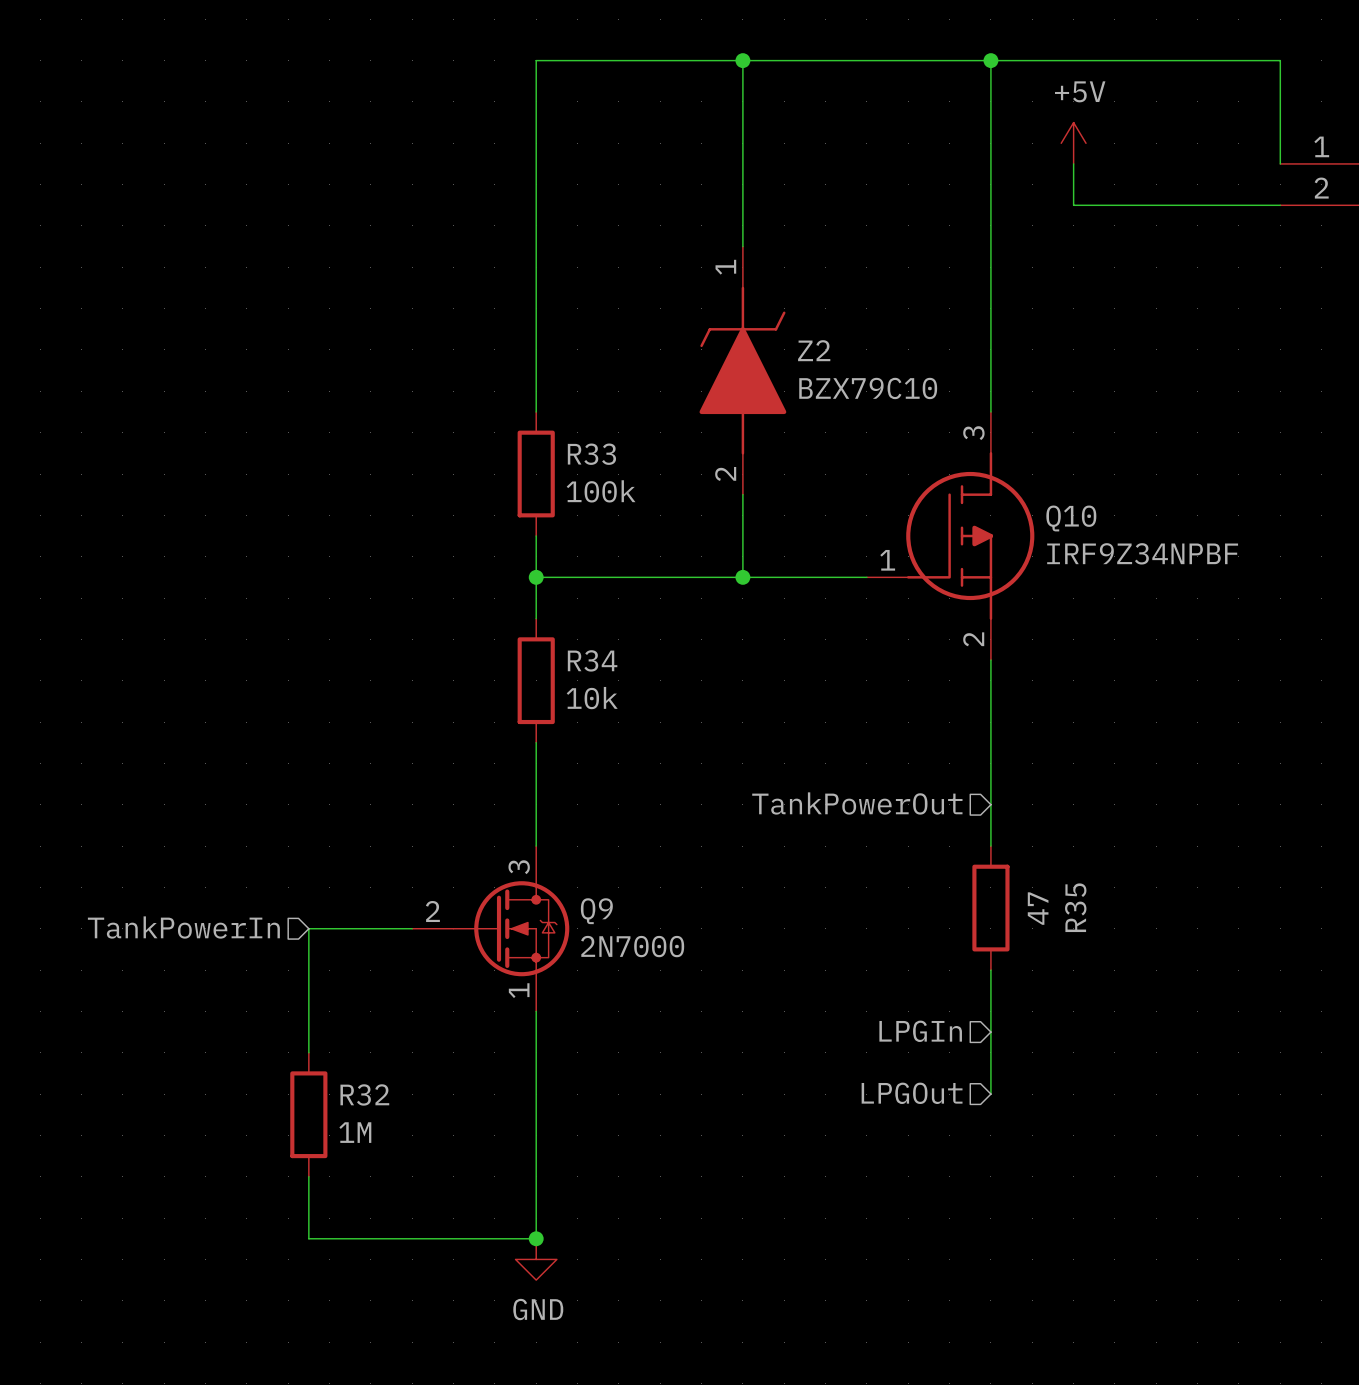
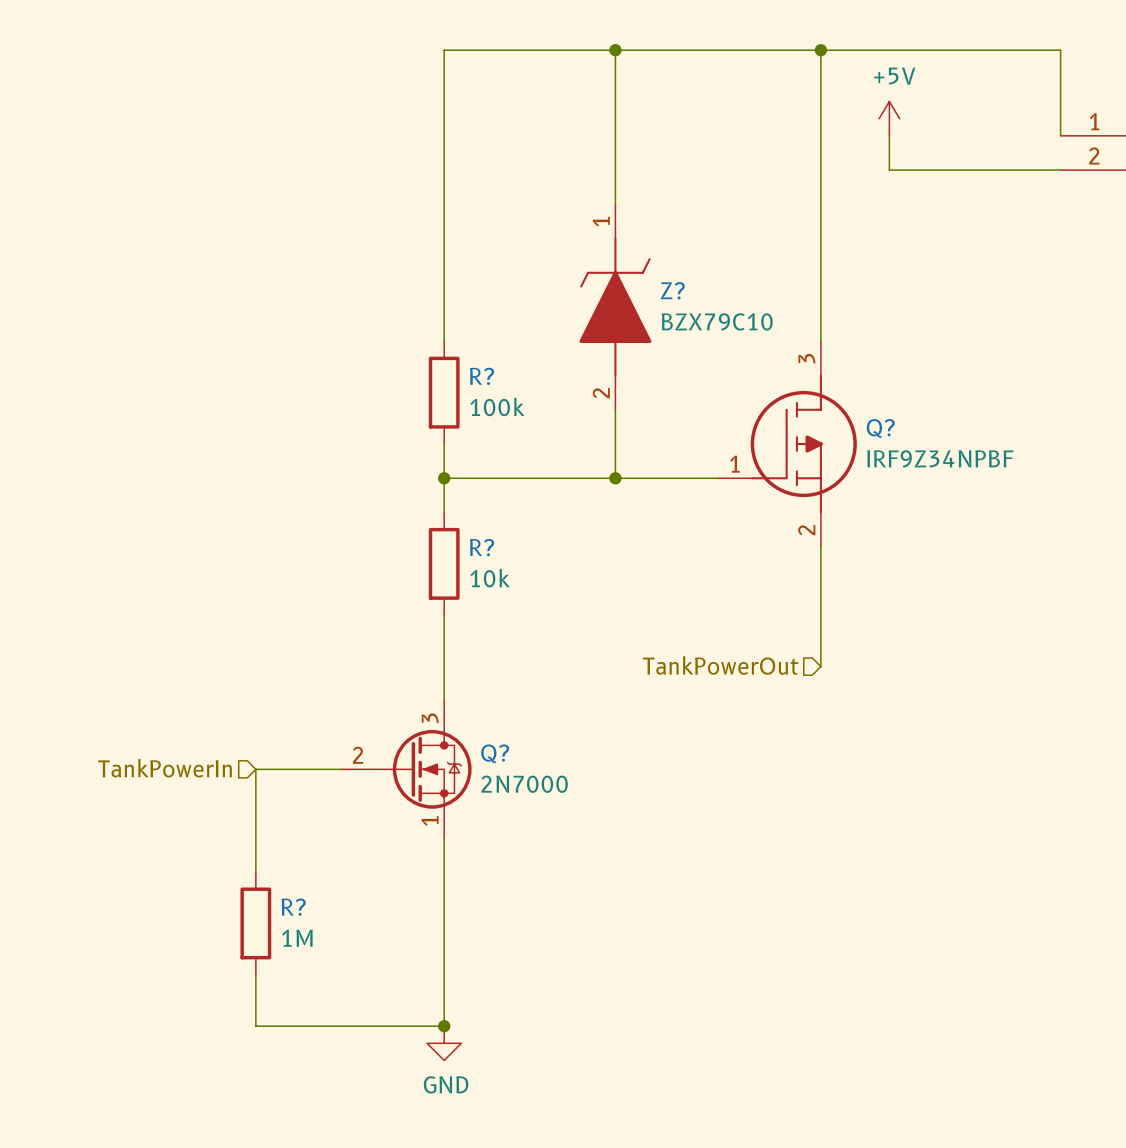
Z2 name: Z2 (814, 350) -> Z? (672, 290)
R33 name: R33 (591, 454) -> R? (482, 376)
Q10 name: Q10 (1071, 518) -> Q? (880, 428)
R34 name: R34 (592, 660) -> R? (482, 547)
wire: (990, 804) (990, 846) -> none
R35: 47 (990, 908) -> none
Q9 name: Q9 (596, 911) -> Q? (495, 753)
wire: (990, 970) (990, 1094) -> none
hierarchical label: LPGIn (920, 1031) -> none
hierarchical label: LPGOut (912, 1093) -> none
R32 name: R32 (364, 1094) -> R? (293, 907)

